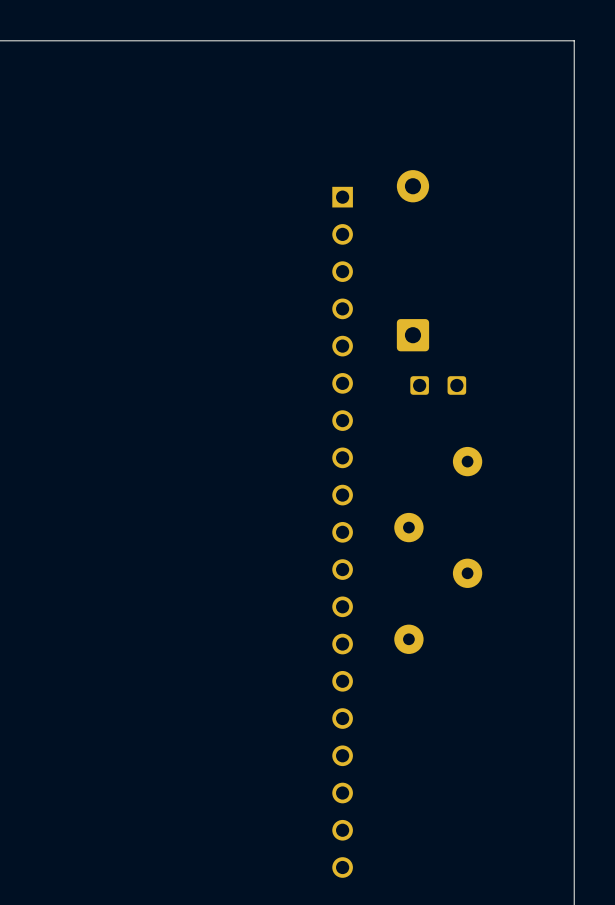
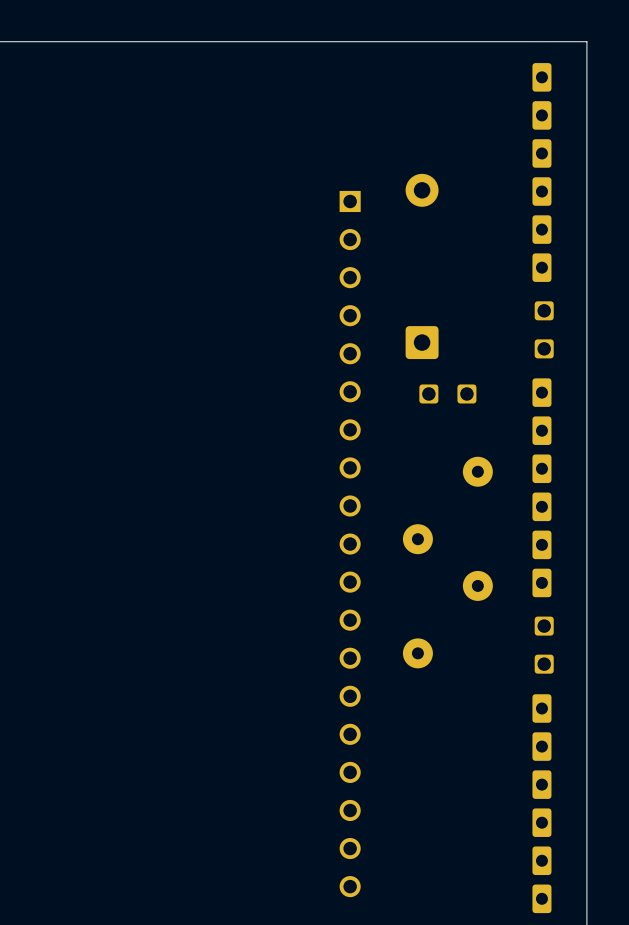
part: none -> (541, 172)
part: none -> (544, 329)
part: none -> (541, 487)
part: none -> (544, 645)
part: none -> (541, 803)

